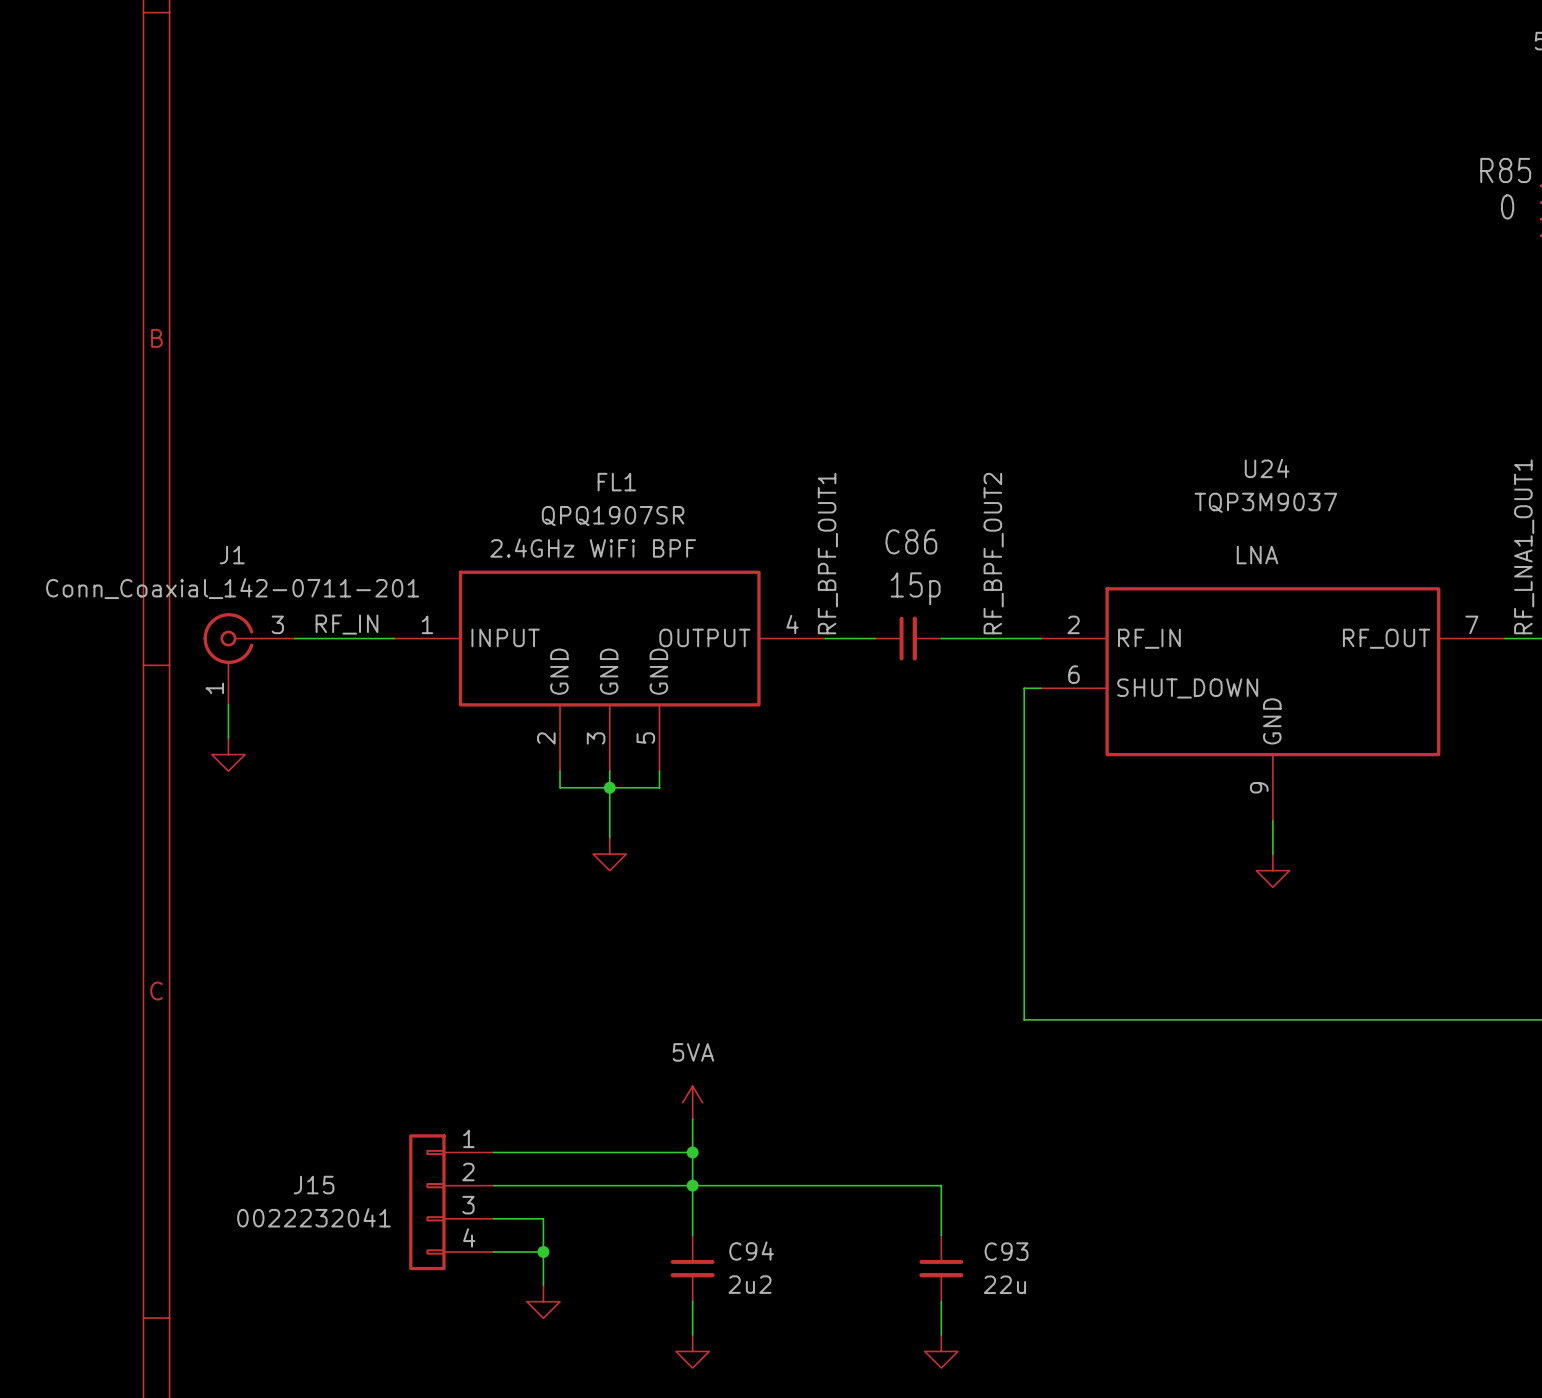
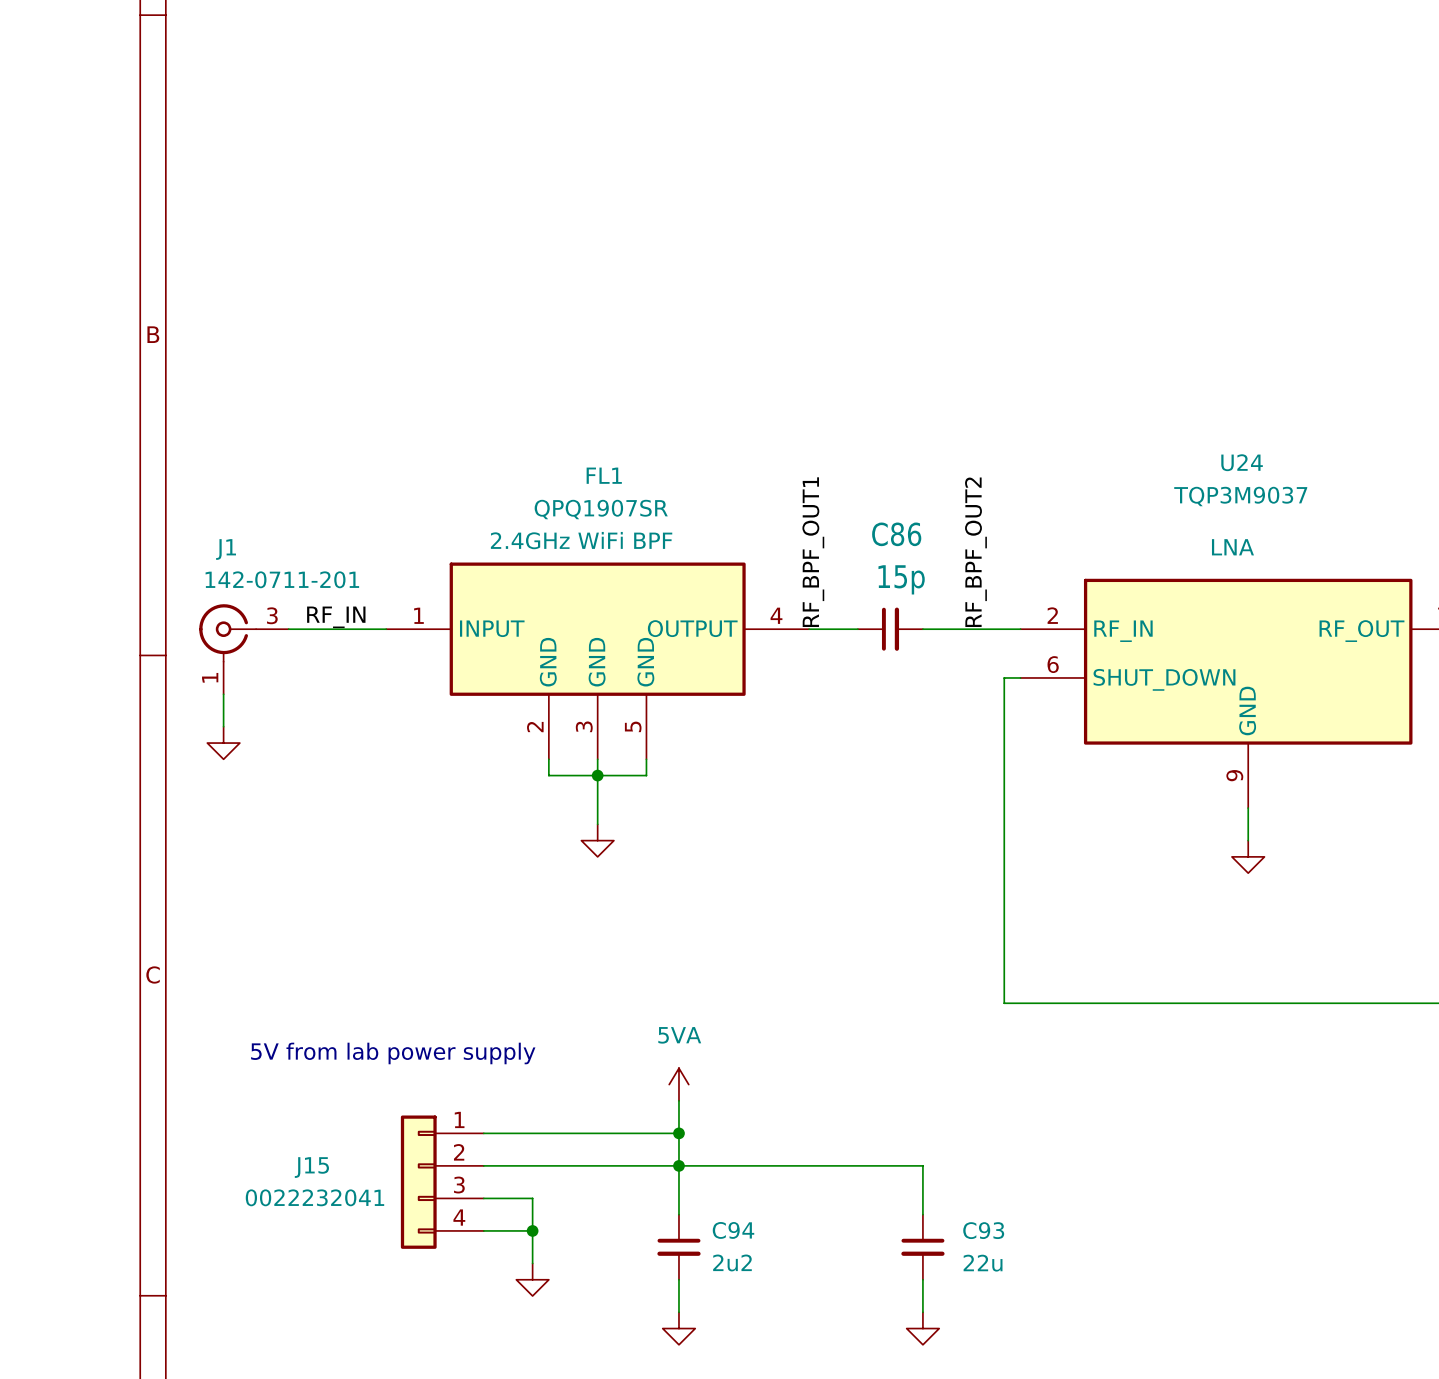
J1 value: Conn_Coaxial_142-0711-201 (232, 588) -> 142-0711-201 (282, 579)
text: none -> 5V from lab power supply (393, 1053)

